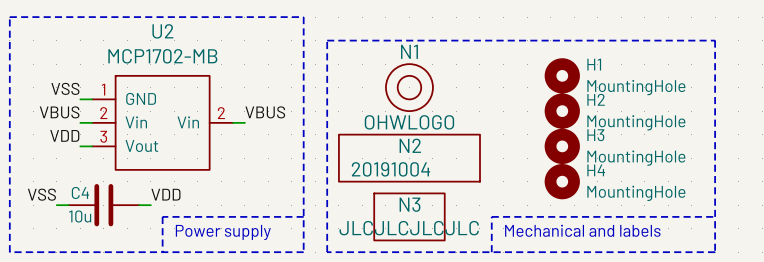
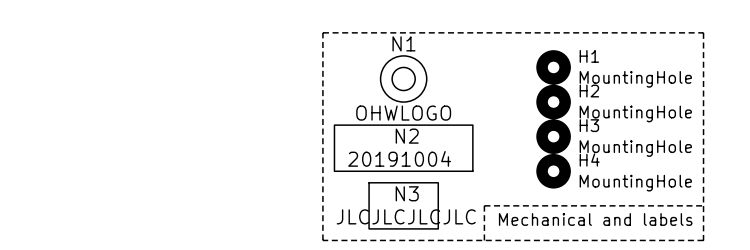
line: (9, 17) (303, 17) (303, 252) (9, 252) (9, 17) -> none
label: VSS (65, 88) -> none
wire: (80, 99) (92, 99) -> none
label: VBUS (59, 112) -> none
label: VBUS (265, 112) -> none
wire: (80, 122) (92, 122) -> none
U2: MCP1702-MB (162, 122) -> none
wire: (233, 122) (244, 122) -> none
label: VDD (64, 135) -> none
wire: (80, 146) (92, 146) -> none
label: VSS (41, 194) -> none
label: VDD (165, 194) -> none
wire: (56, 205) (68, 205) -> none
C4: 10u (103, 205) -> none
wire: (139, 205) (150, 205) -> none
line: (303, 216) (162, 216) (162, 252) -> none
text: Power supply (223, 232) -> none

